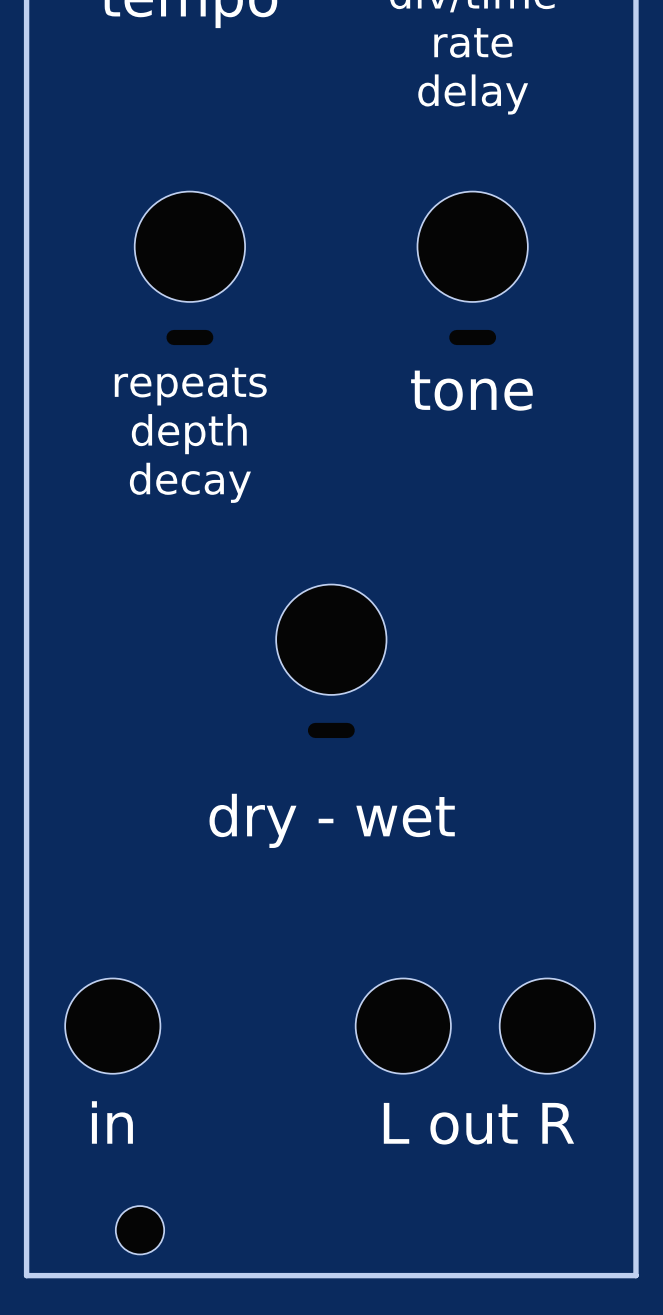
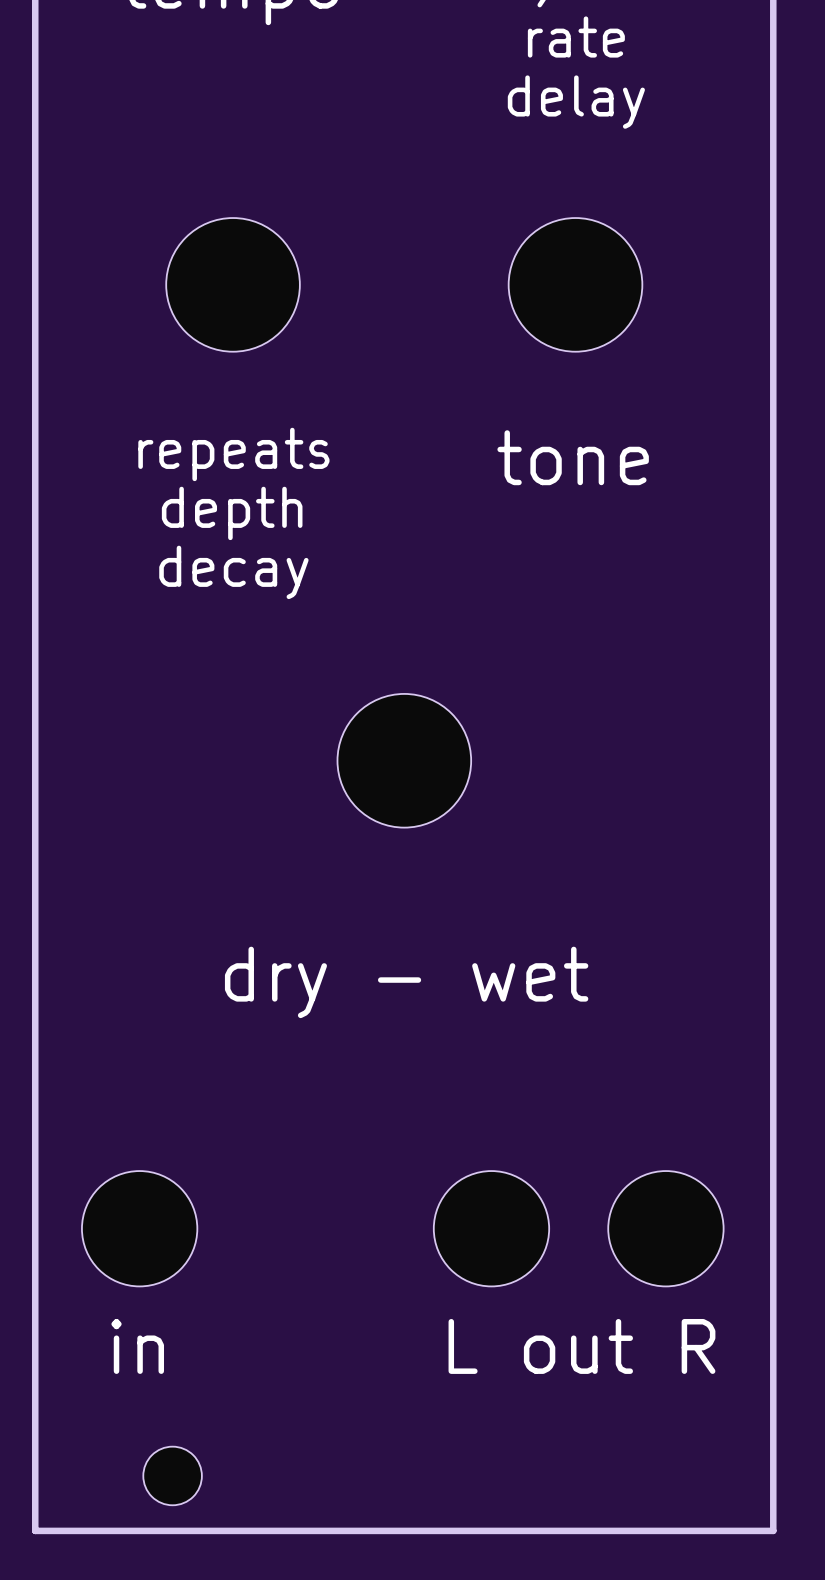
part: (189, 268) -> none
part: (472, 268) -> none
part: (331, 661) -> none

